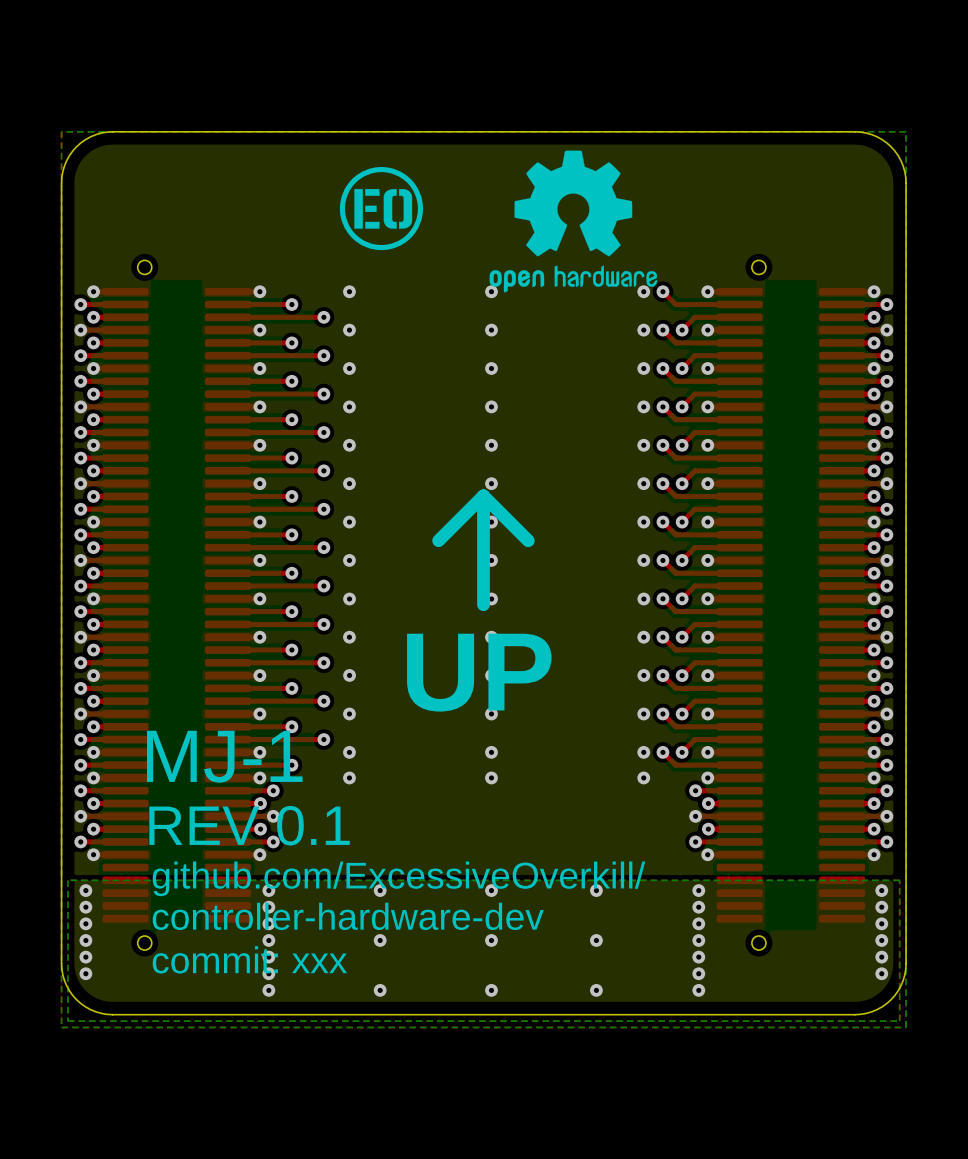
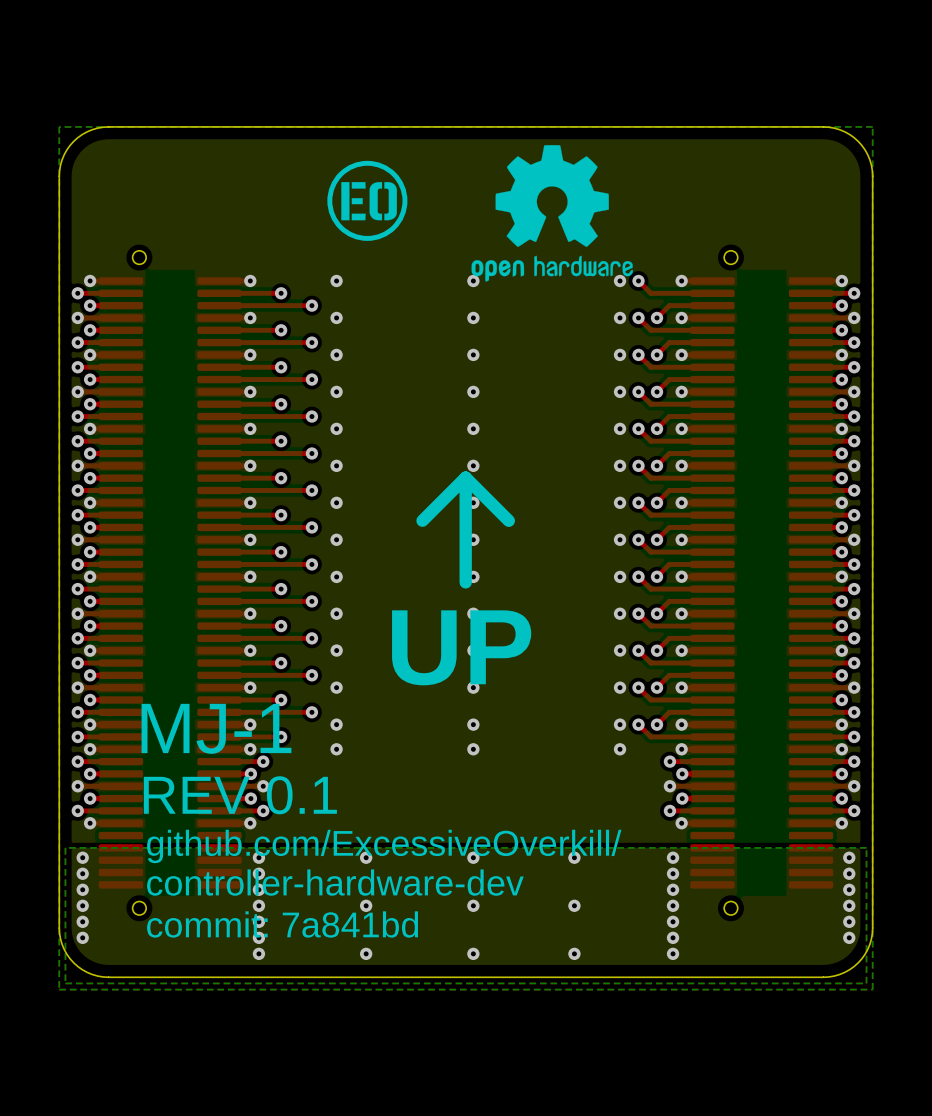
text: commit: xxx (249, 959) -> commit: 7a841bd (282, 924)

